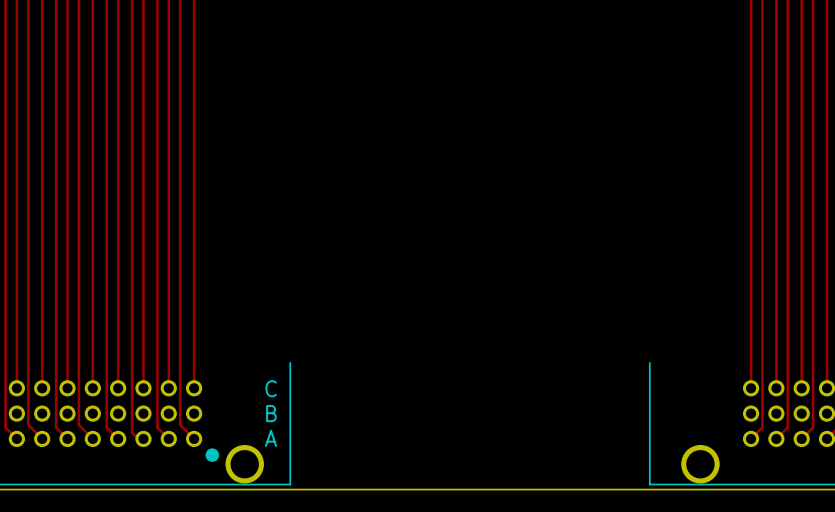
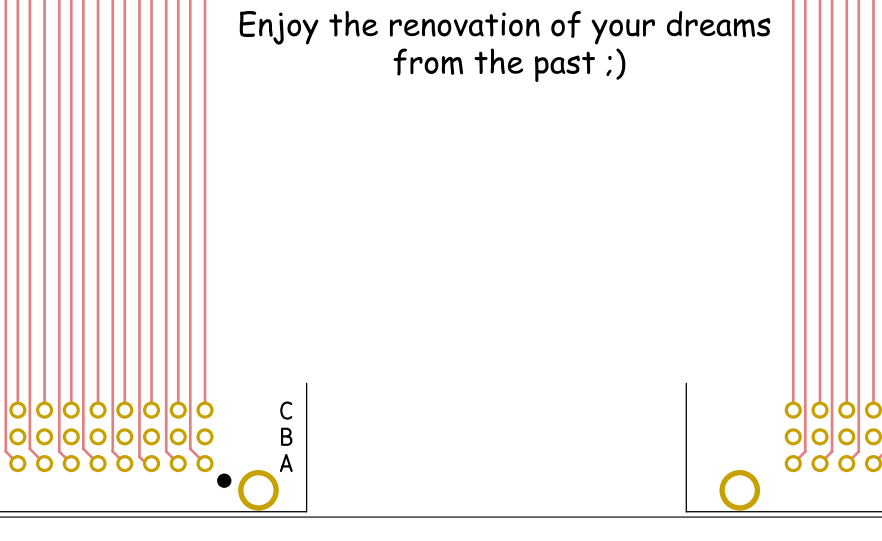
drawing: none -> [239, 10, 771, 82]

